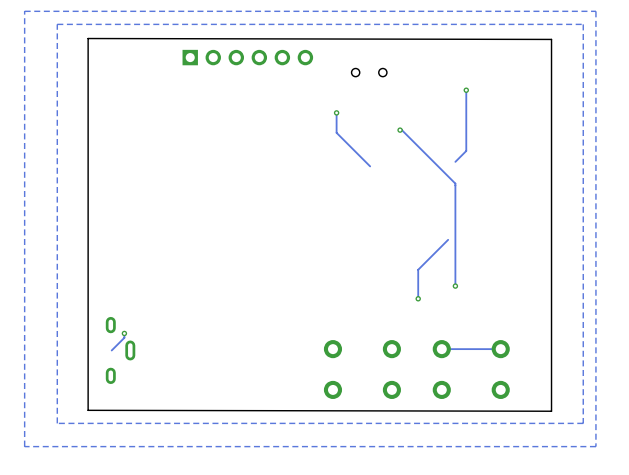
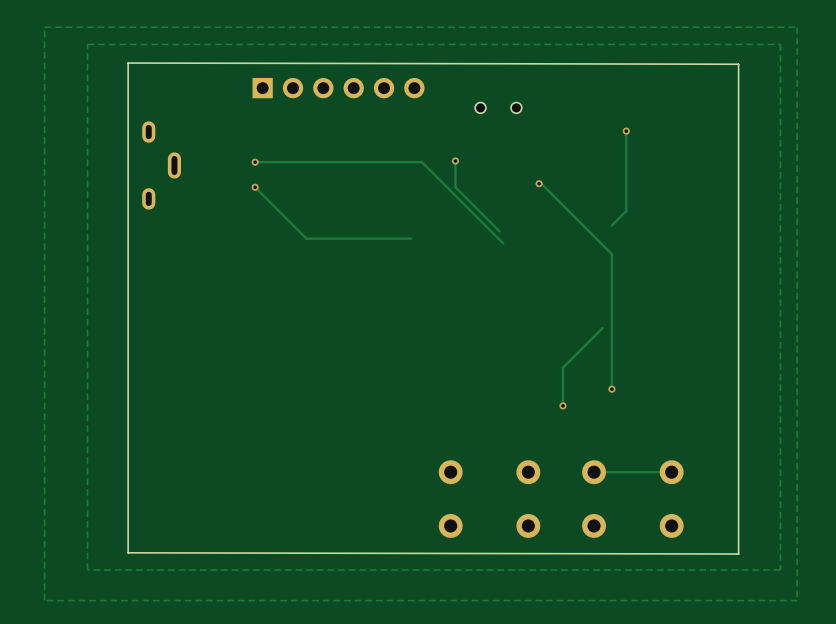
track: none -> (255, 162) (422, 162) (503, 243)
via: none -> (255, 162)
part: none -> (161, 165)
track: none -> (255, 187) (306, 238) (411, 238)
via: none -> (255, 187)
track: (124, 333) (124, 337) (111, 350) -> none
via: (124, 333) -> none
part: (120, 350) -> none

